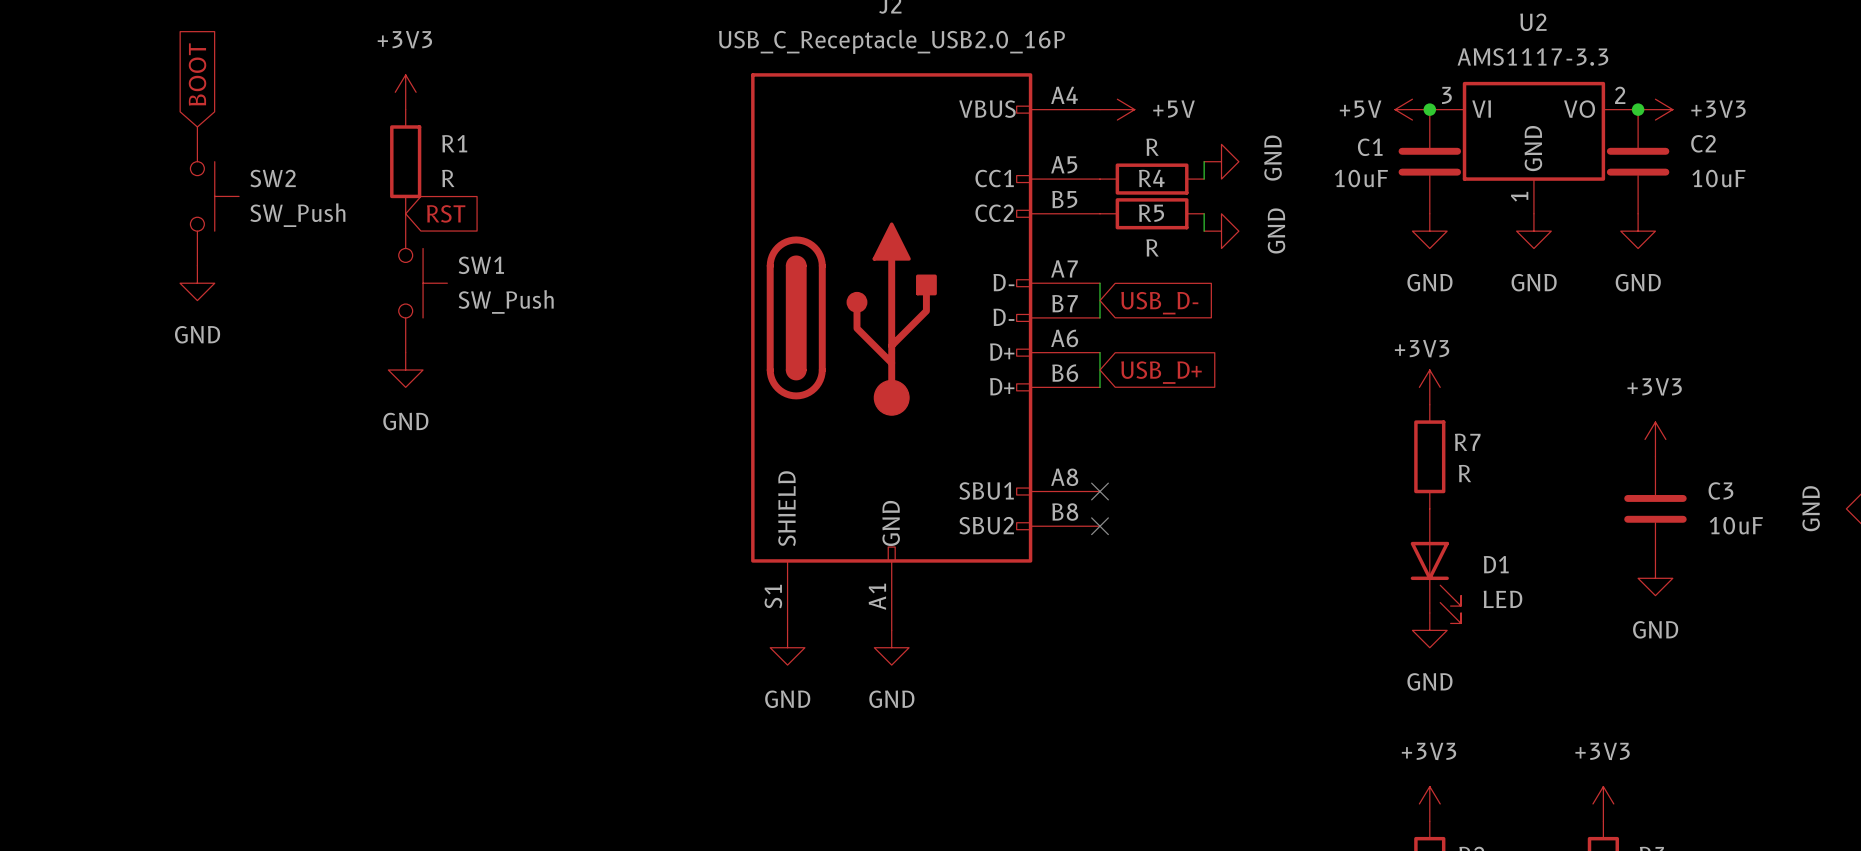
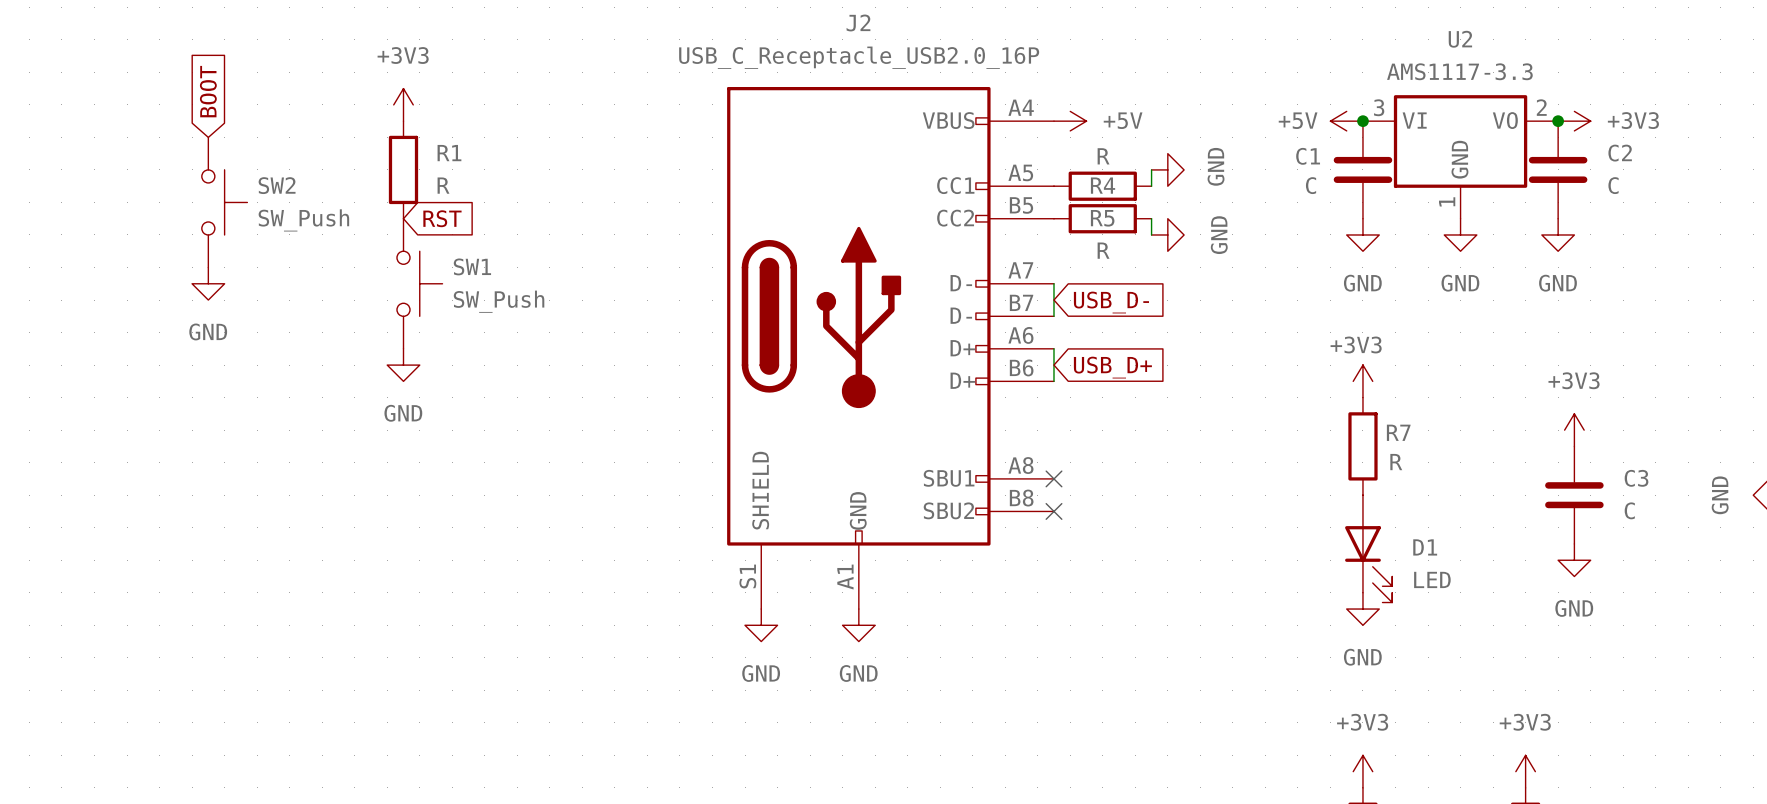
C1 value: 10uF (1361, 178) -> C (1311, 185)
C2 value: 10uF (1718, 178) -> C (1613, 185)
C3 value: 10uF (1736, 525) -> C (1629, 510)

